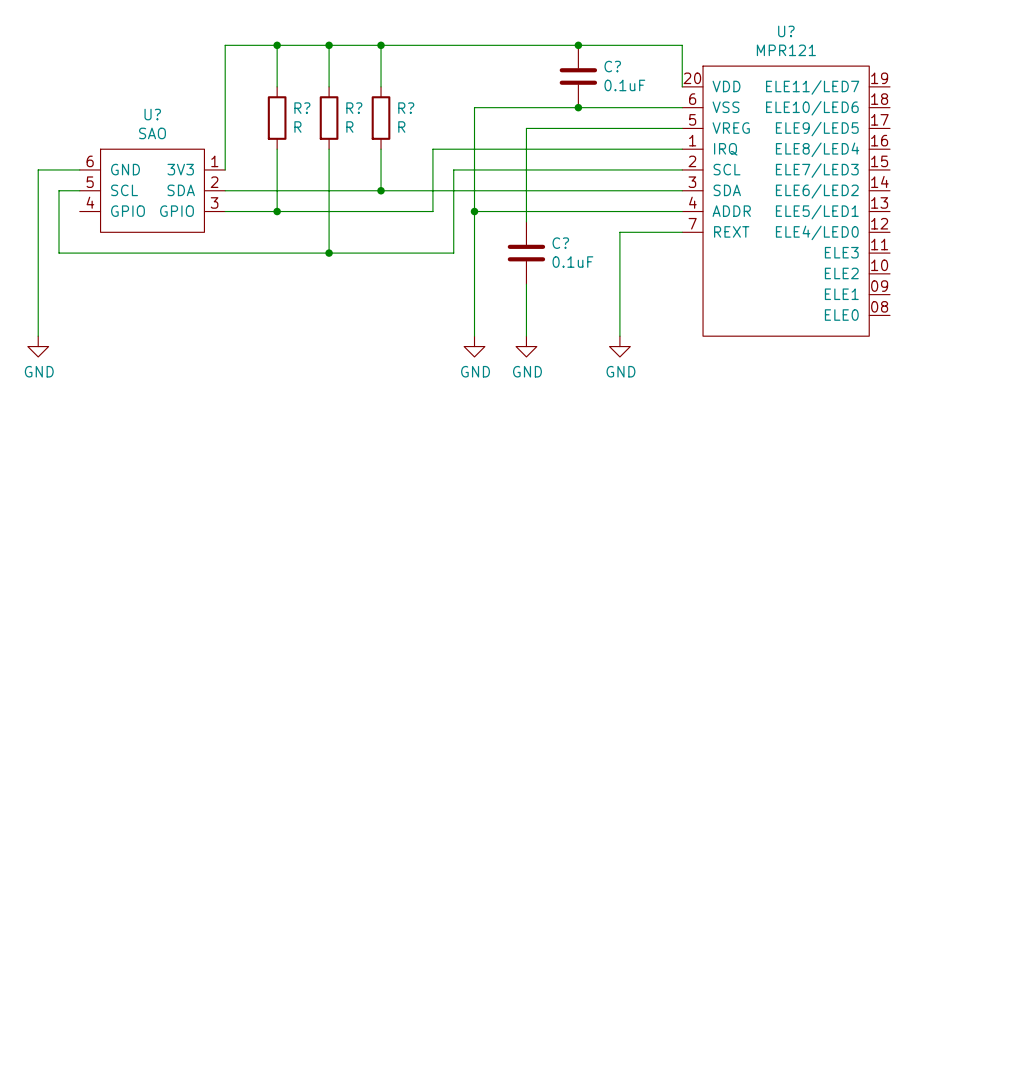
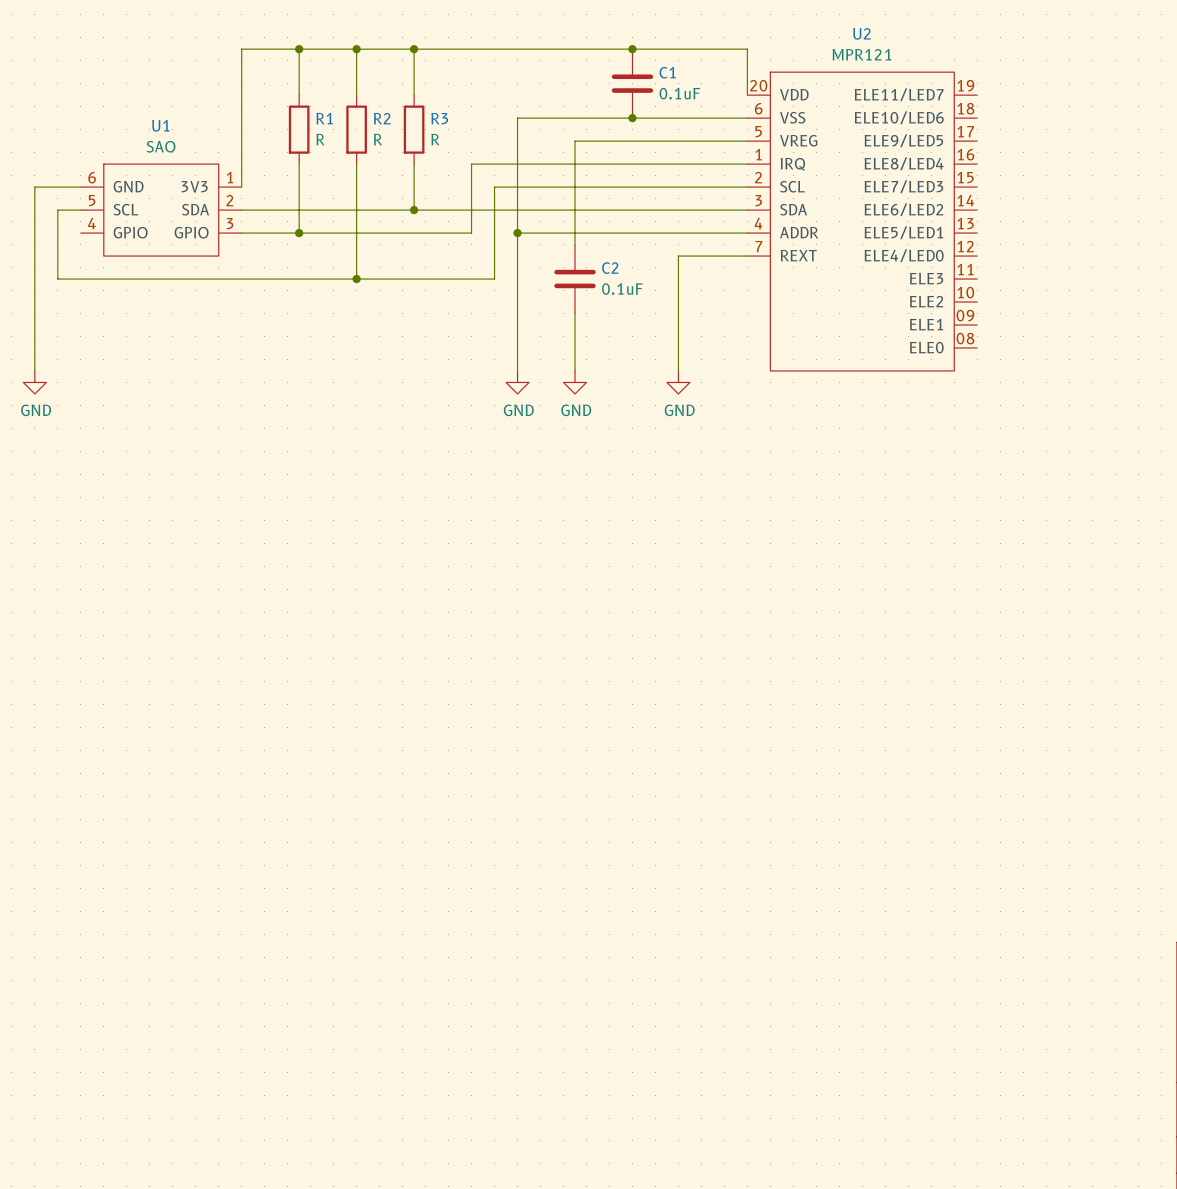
U? name: U? (786, 31) -> U2 (861, 33)
C? name: C? (612, 66) -> C1 (667, 72)
R? name: R? (302, 108) -> R1 (324, 118)
R? name: R? (354, 108) -> R2 (382, 118)
R? name: R? (406, 108) -> R3 (439, 118)
U? name: U? (152, 114) -> U1 (160, 125)
C? name: C? (560, 243) -> C2 (610, 268)

